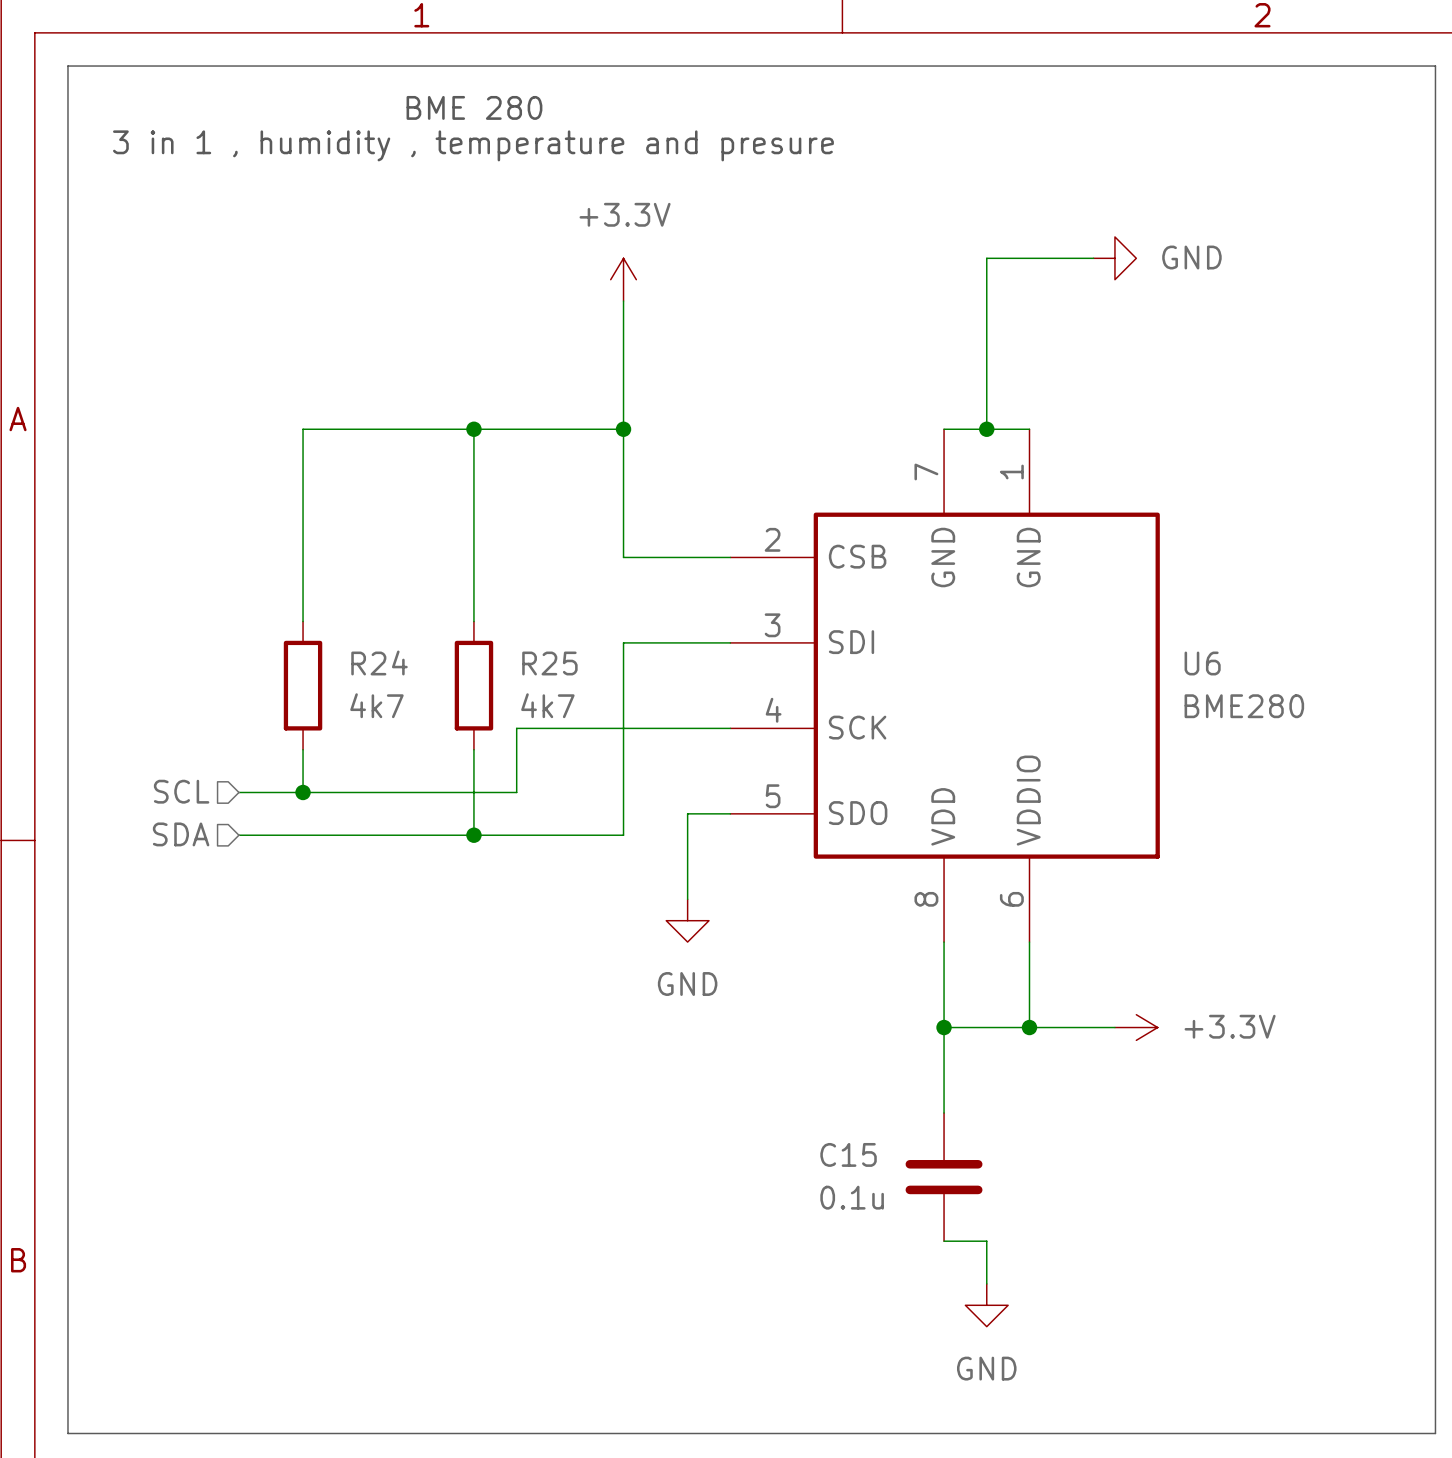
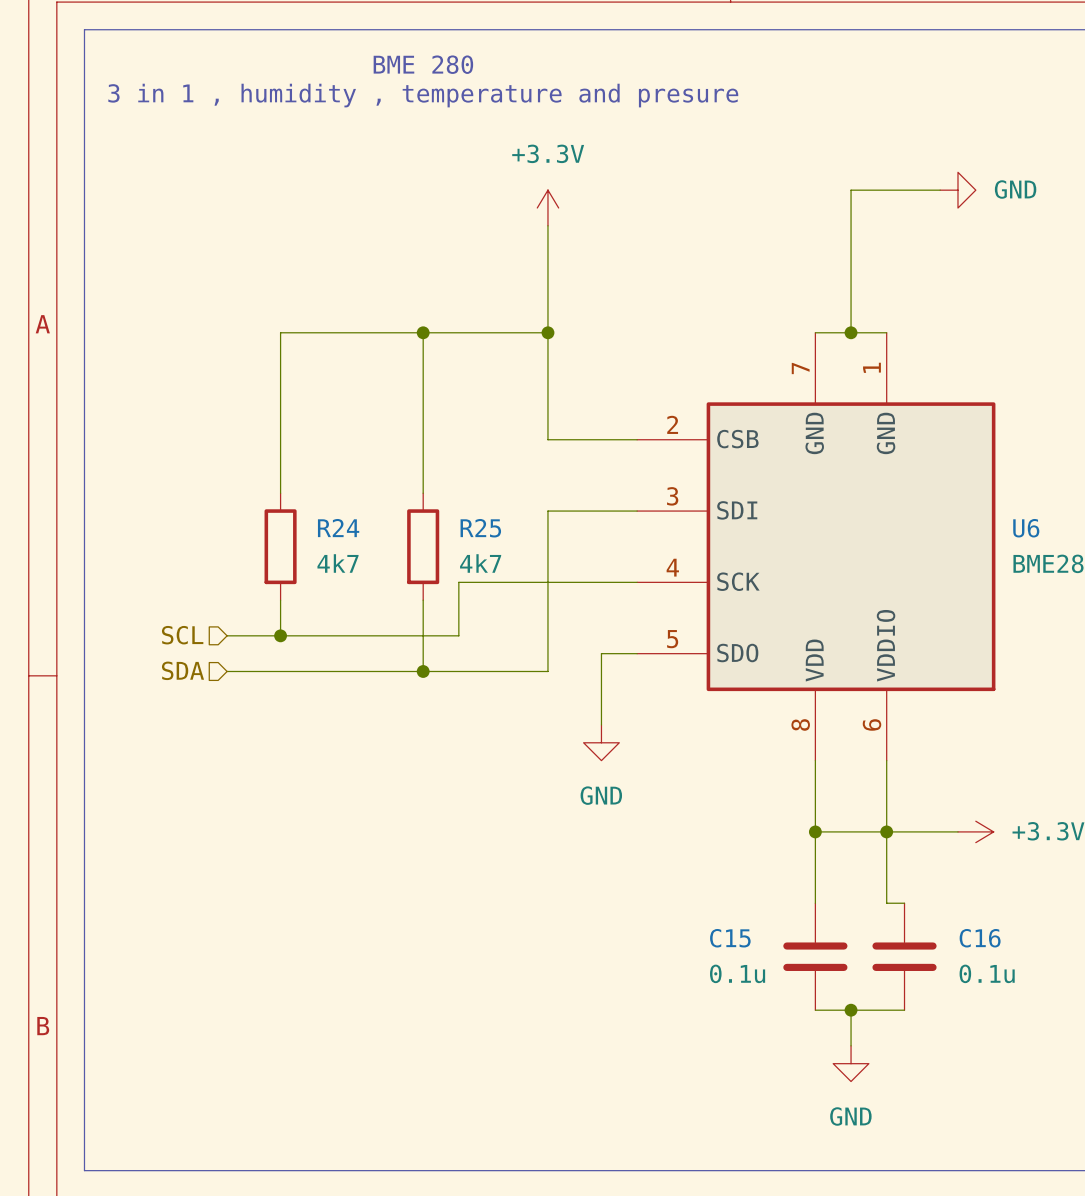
wire: none -> (886, 831) (886, 903) (904, 903)
C16: none -> 0.1u (904, 956)
wire: none -> (851, 1010) (904, 1010)
junction: none -> (851, 1010)

